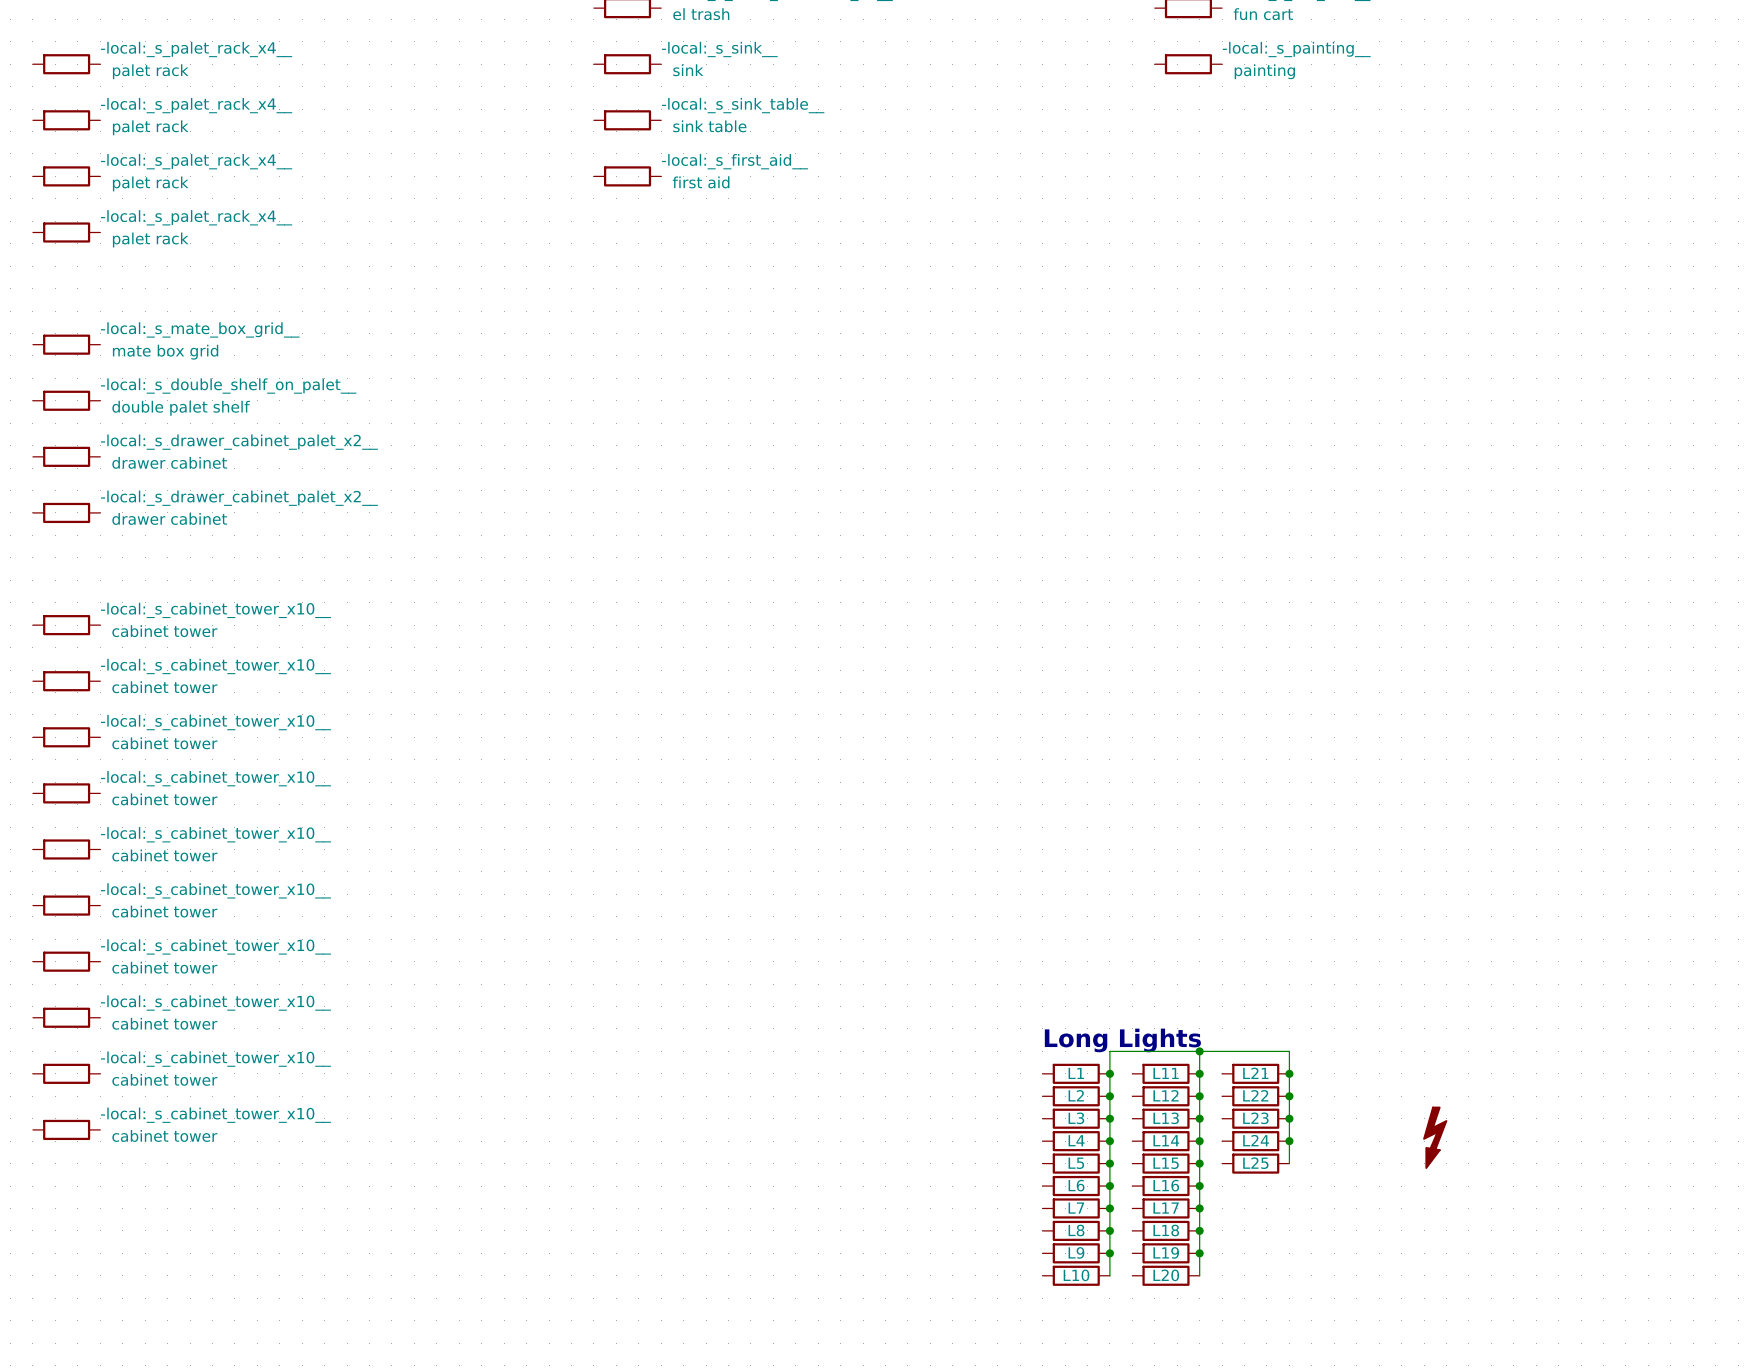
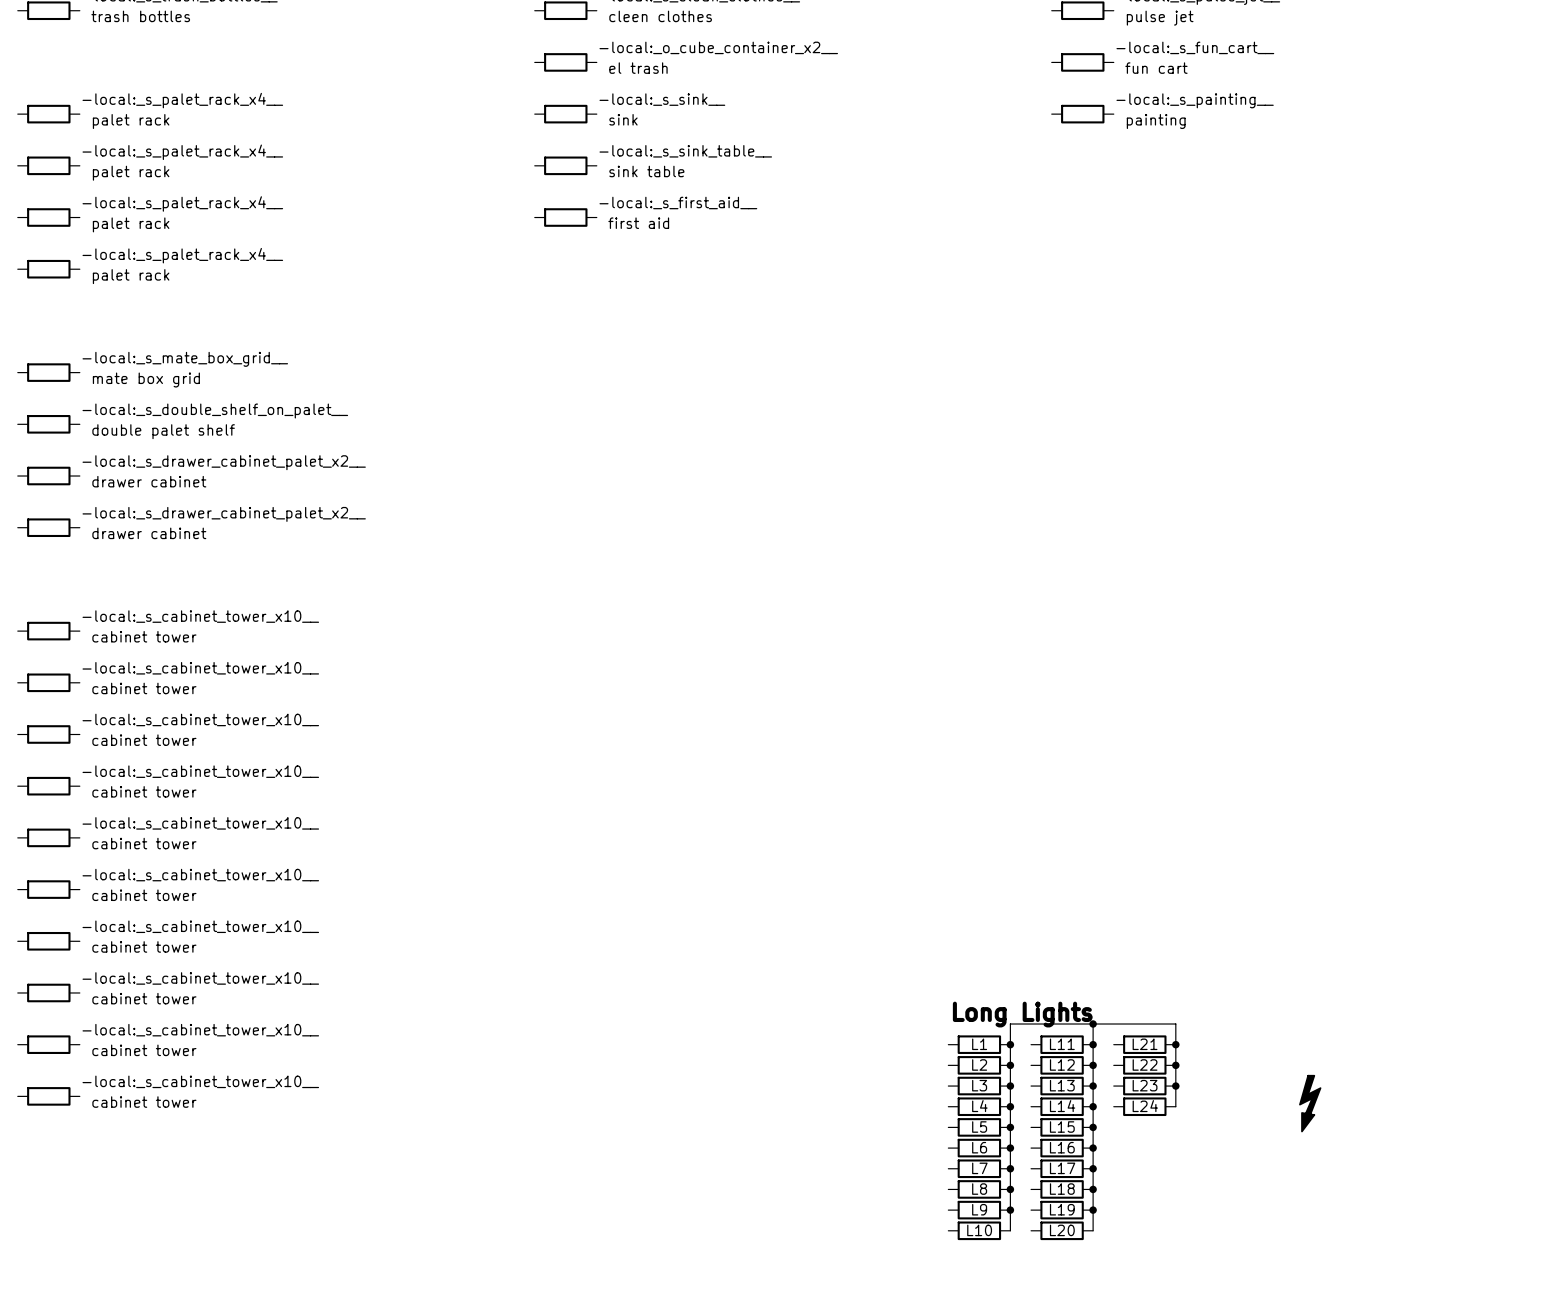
wire: (1289, 1141) (1289, 1163) -> none
junction: (1289, 1141) -> none
L25: (1255, 1163) -> none

